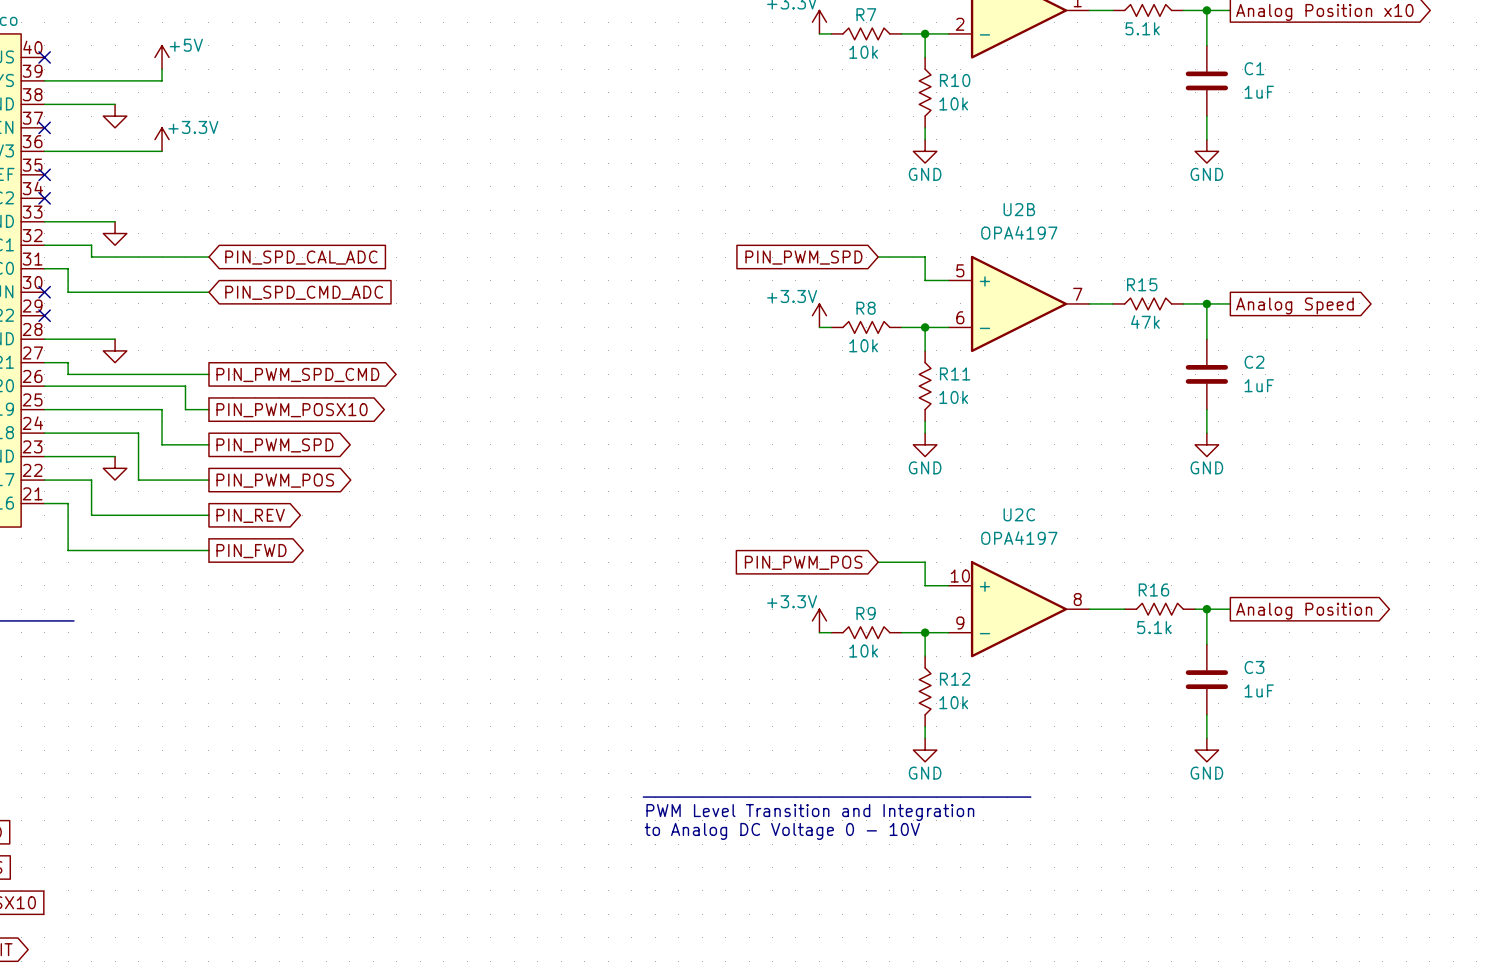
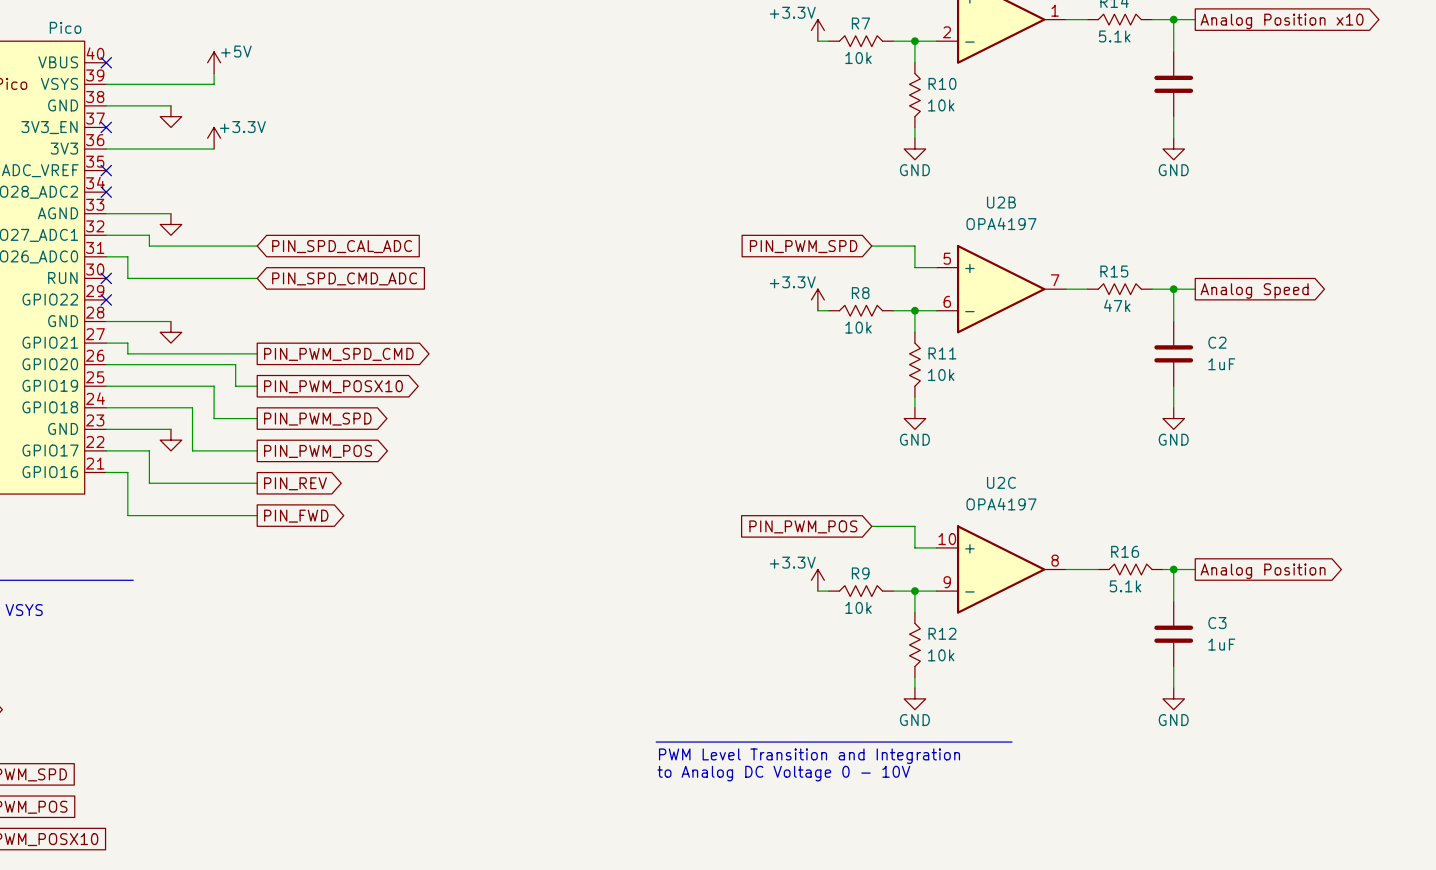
C1 name: C1 (1254, 68) -> none
C1 value: 1uF (1259, 92) -> none

